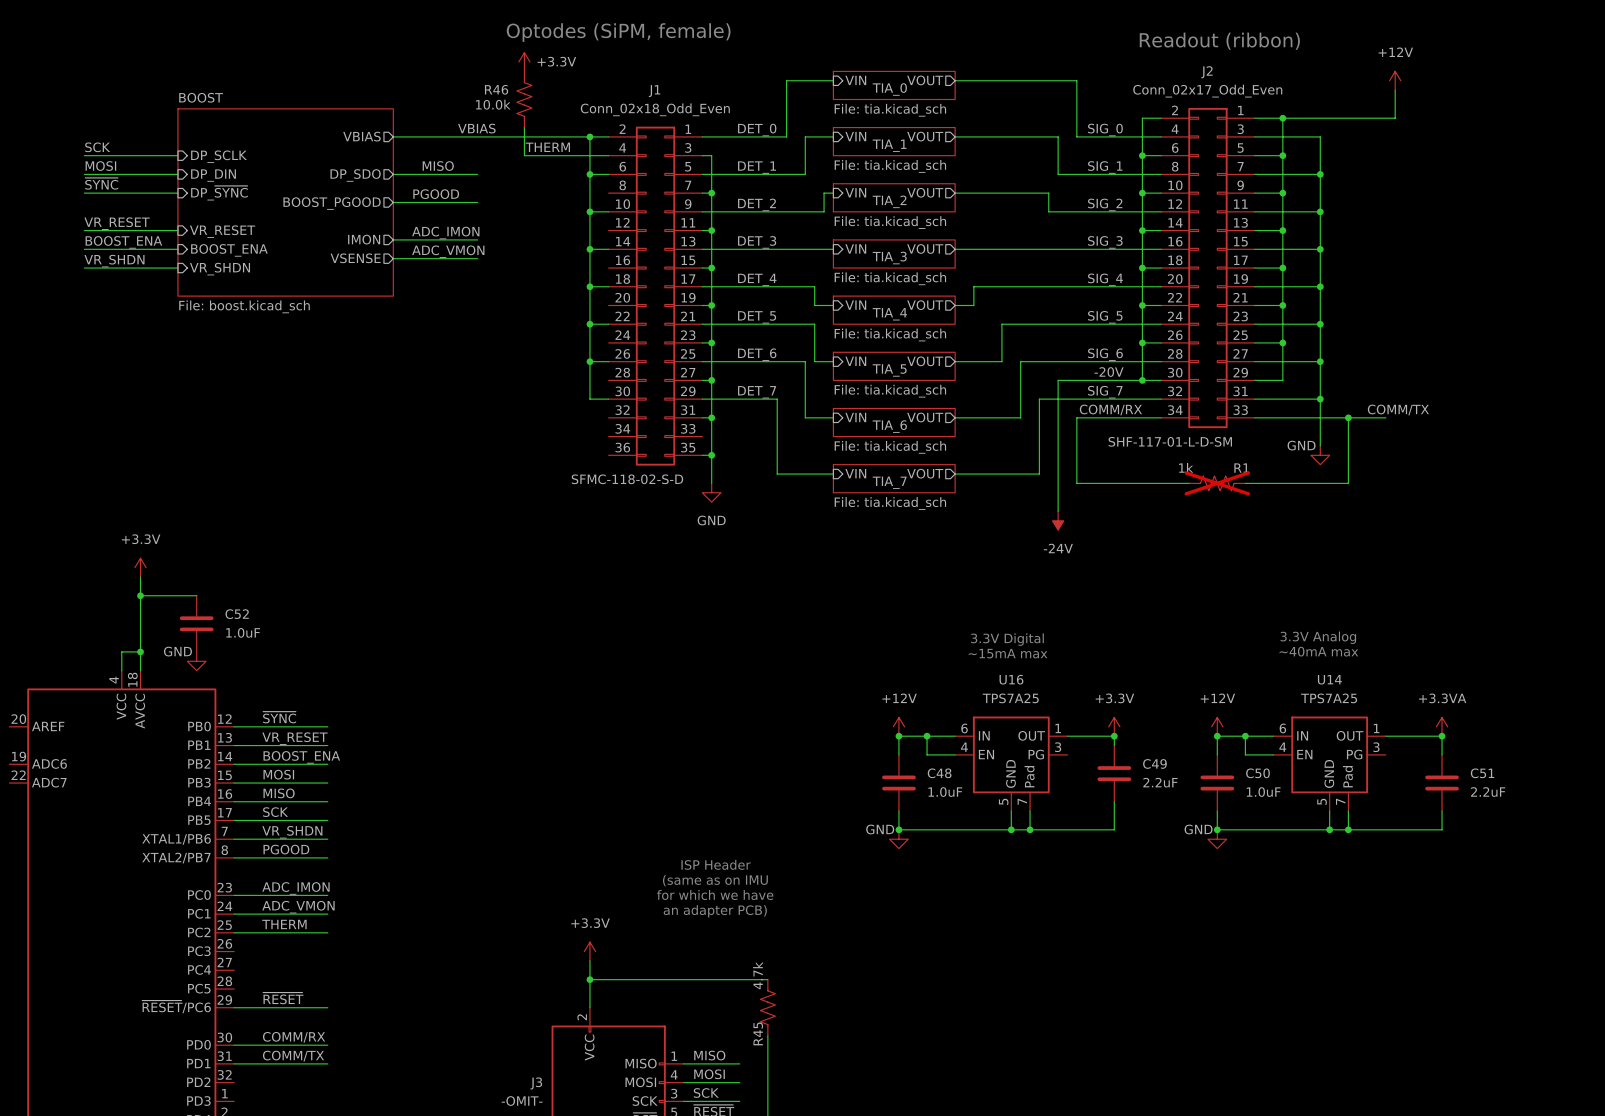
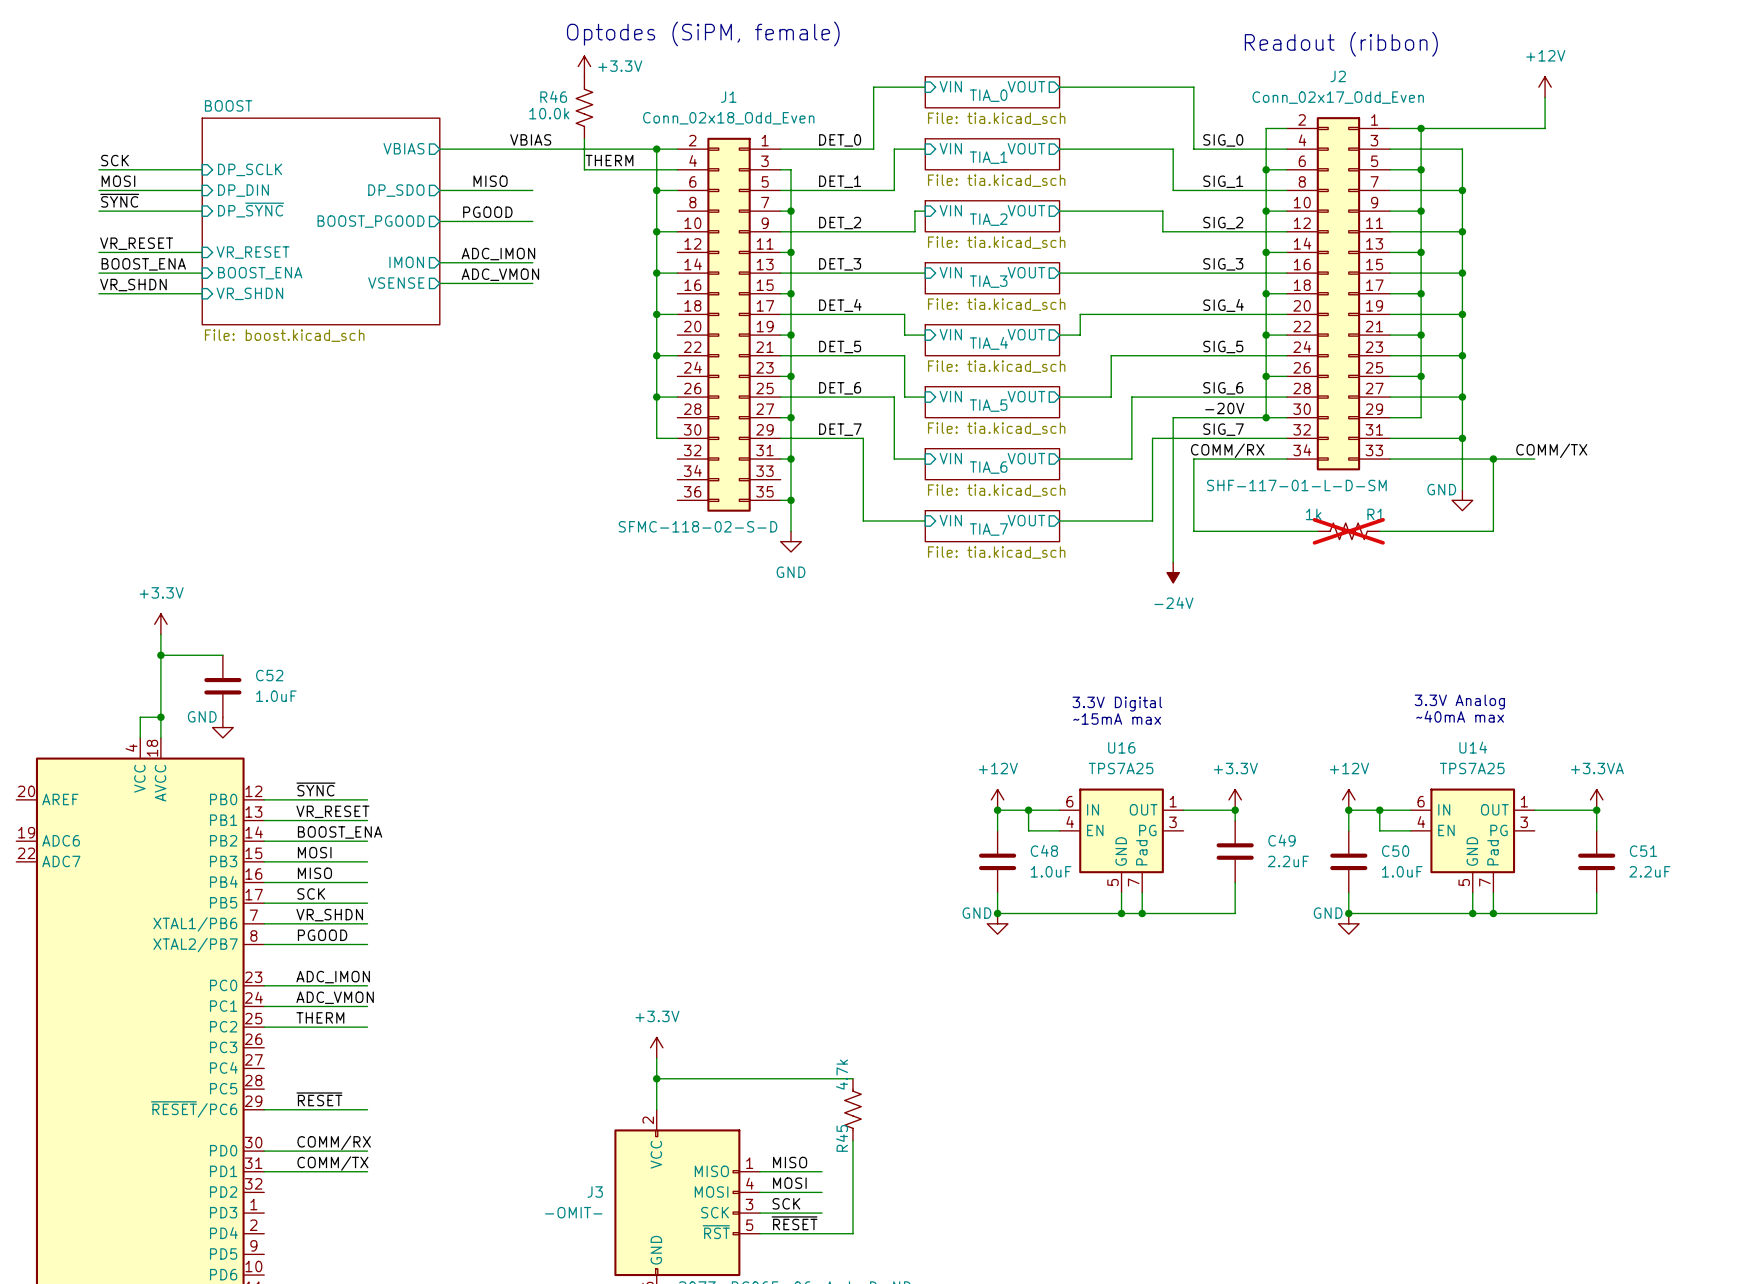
text: ISP Header (716, 864) -> none
text: (same as on IMU (715, 880) -> none
text: for which we have (715, 895) -> none
text: an adapter PCB) (715, 911) -> none

